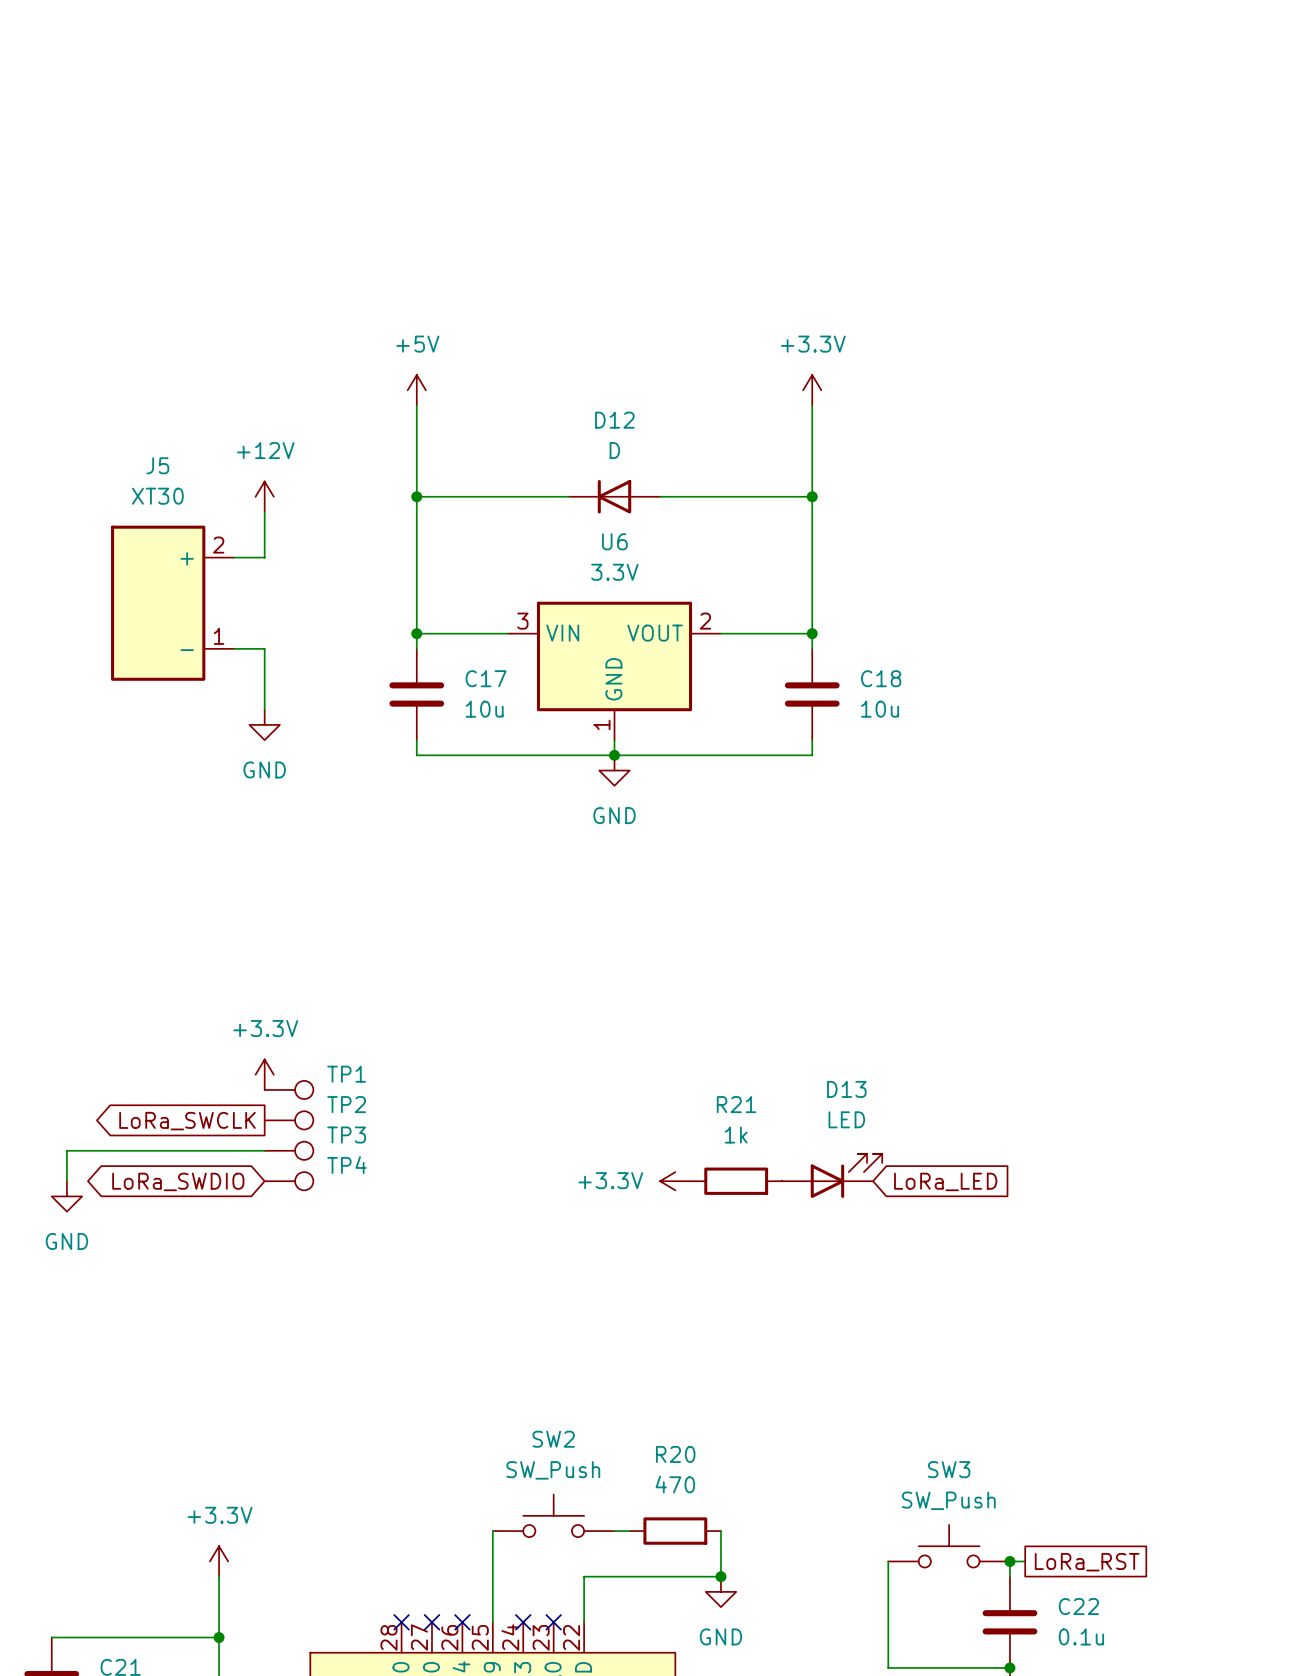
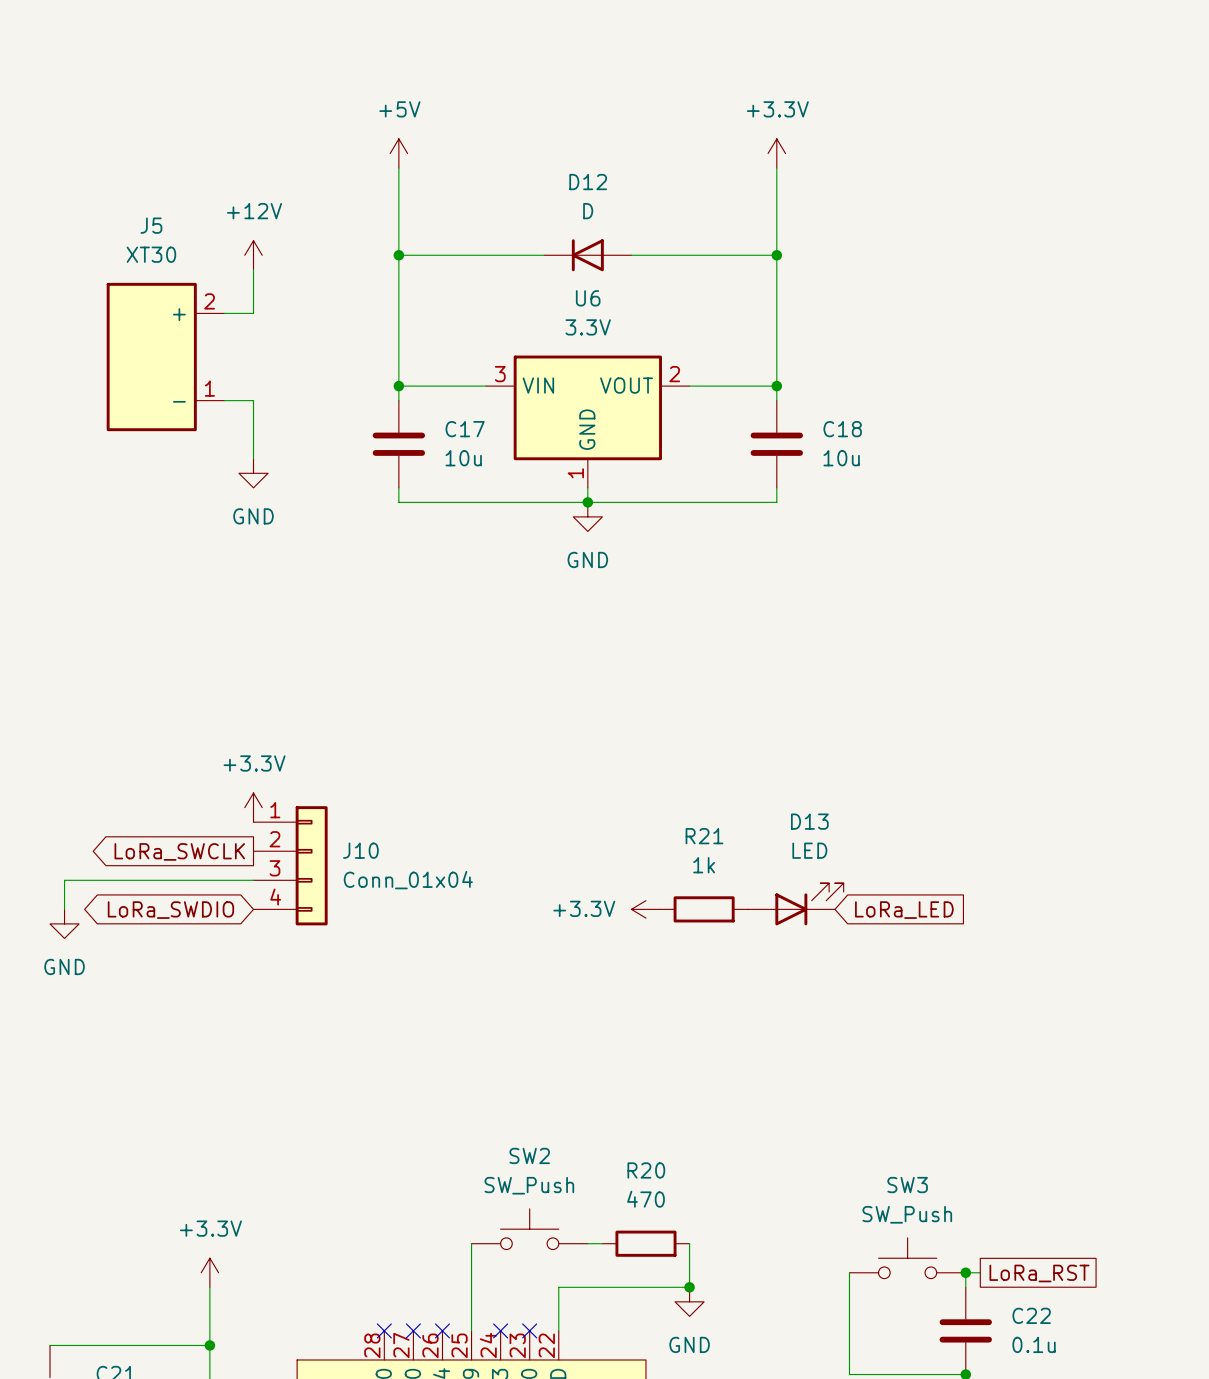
TP1: (289, 1089) -> none
TP2: (289, 1120) -> none
J10: none -> Conn_01x04 (290, 865)
TP3: (289, 1150) -> none
TP4: (289, 1181) -> none

